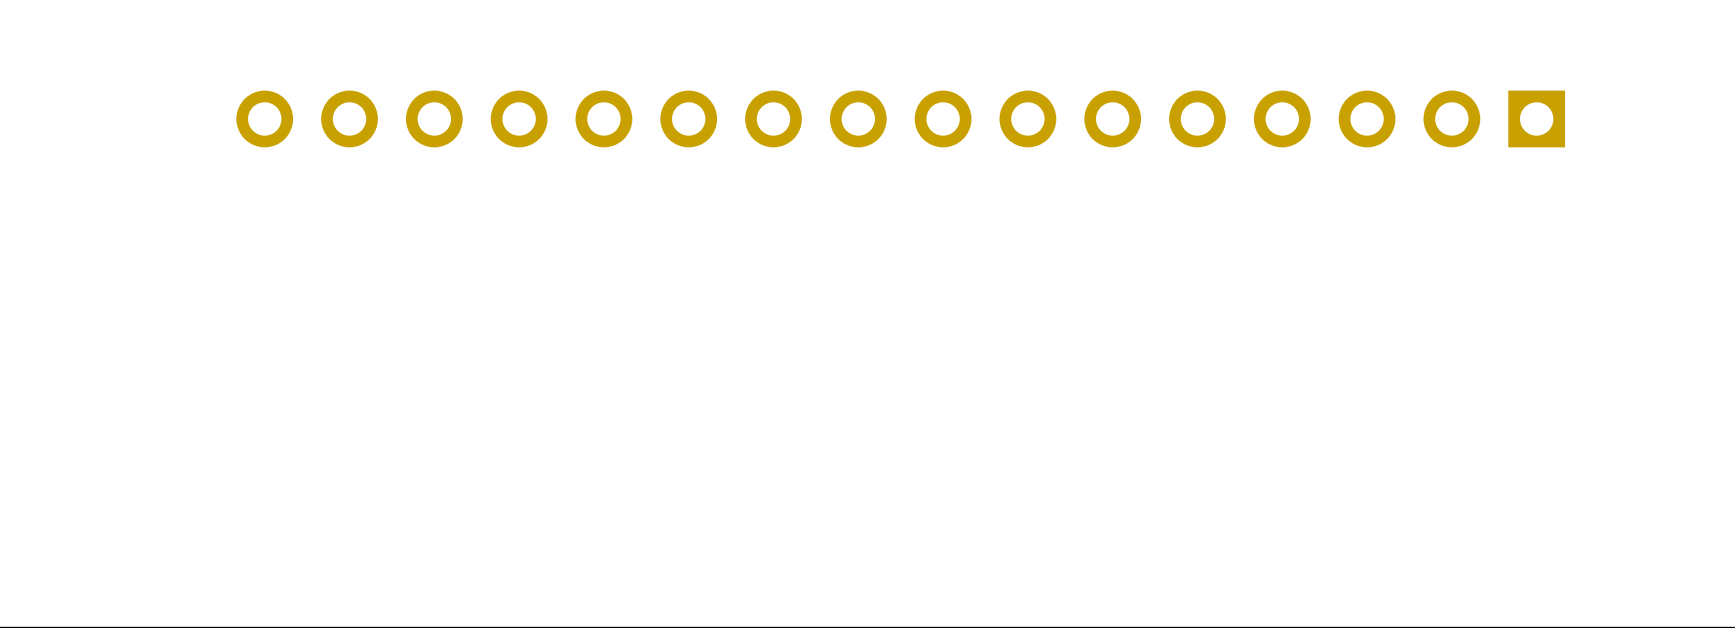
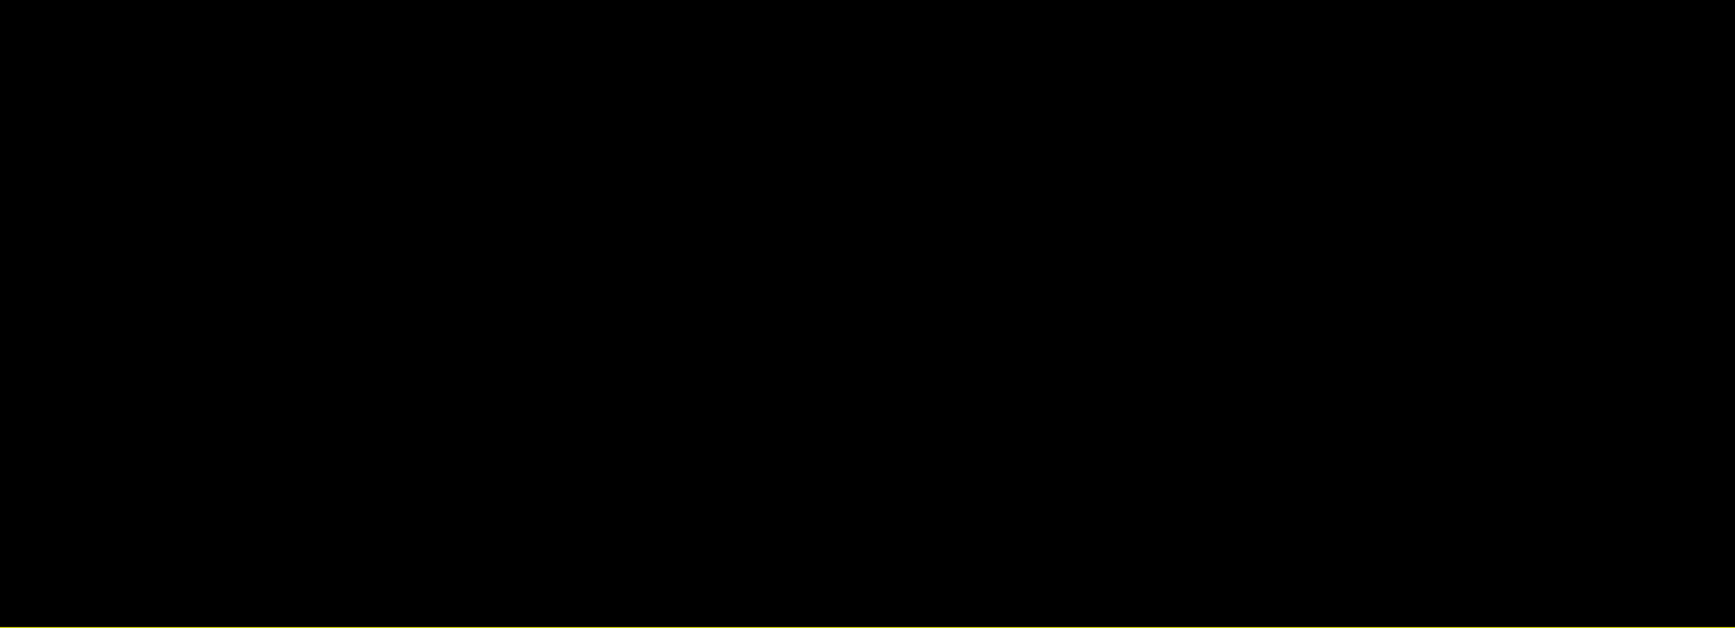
part: (900, 118) -> none

